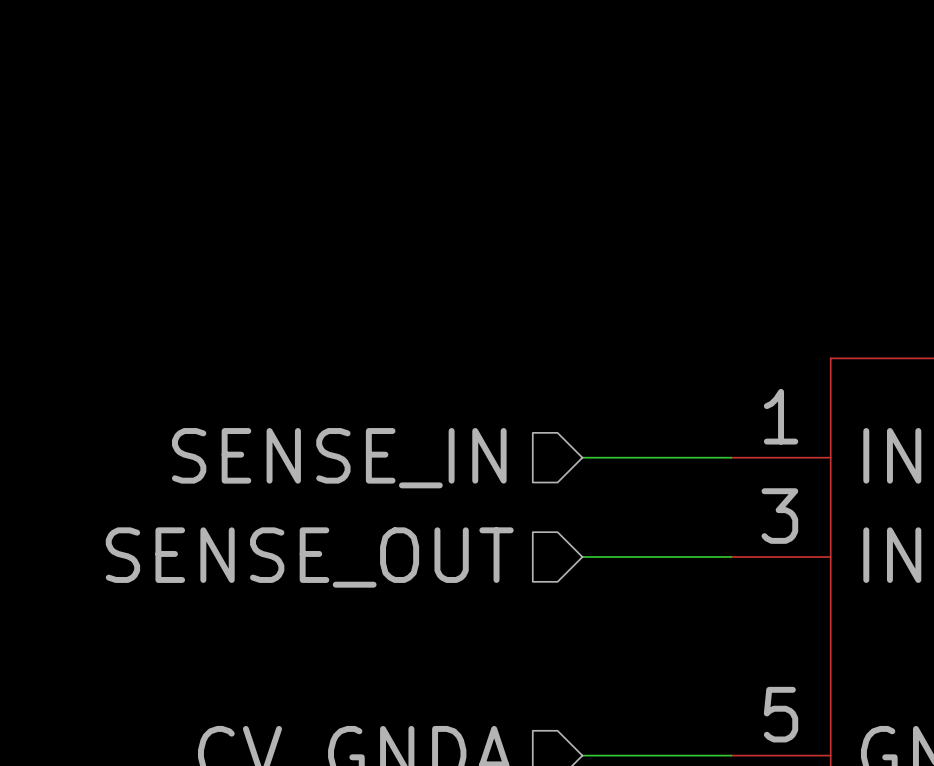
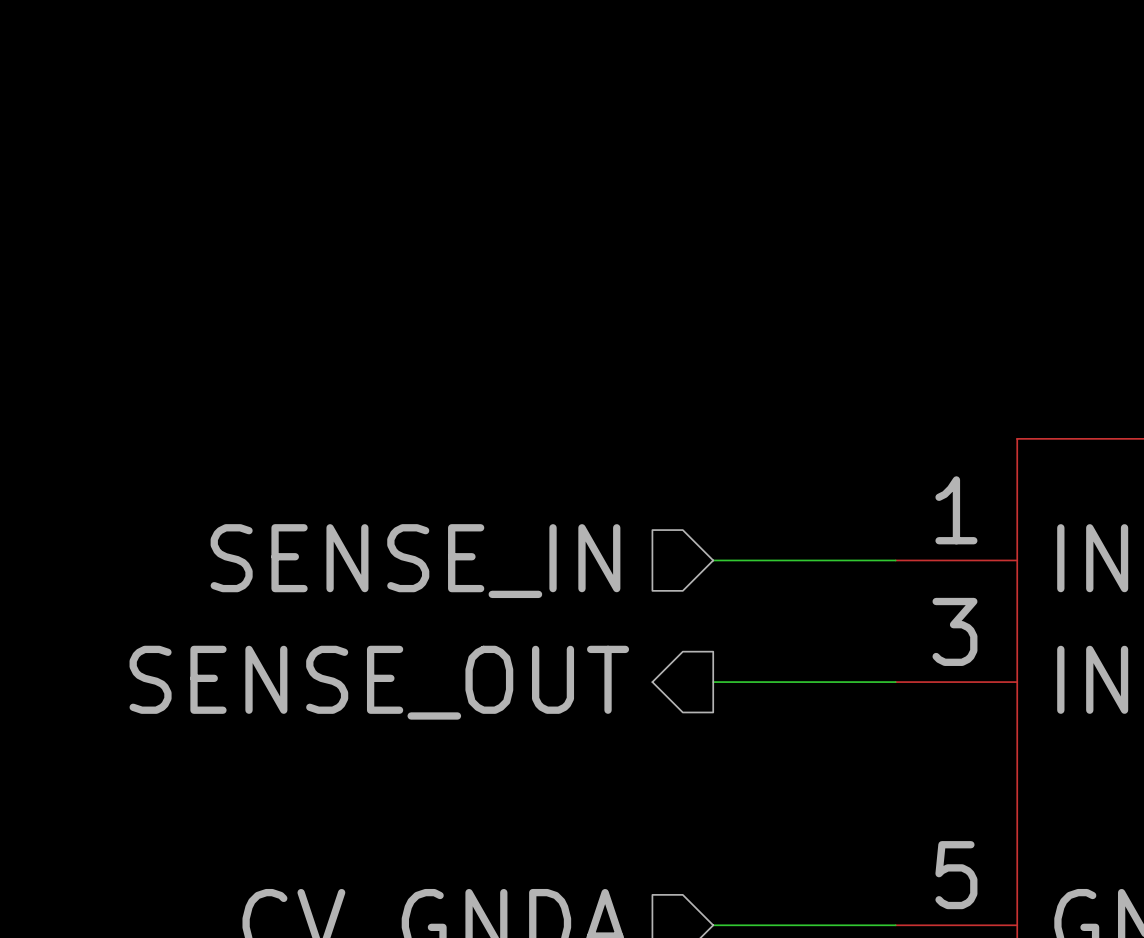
hierarchical label shape: input (309, 557) -> output (379, 682)

